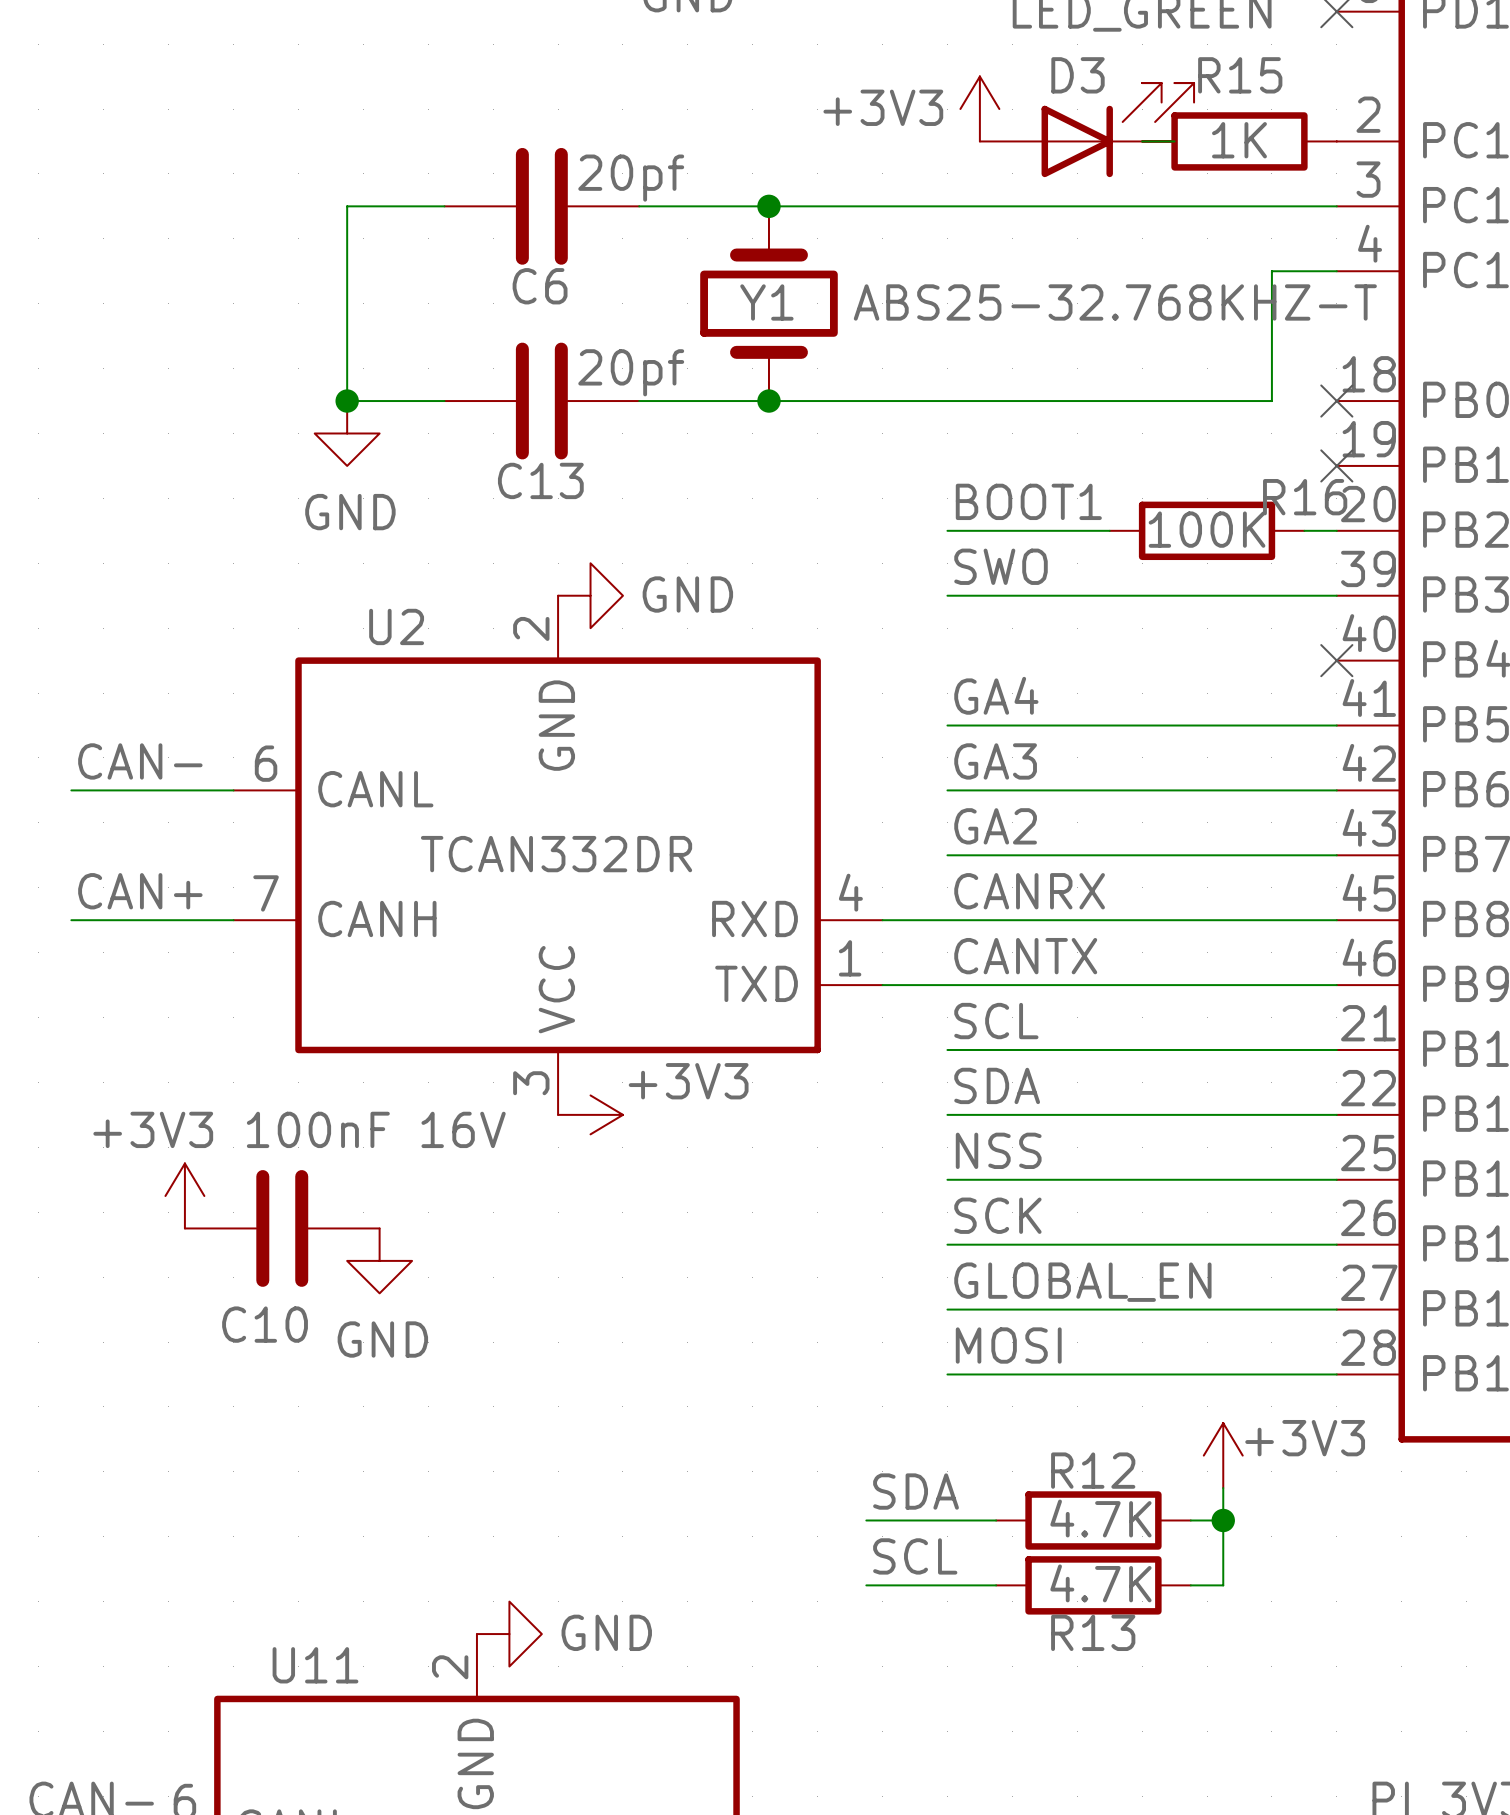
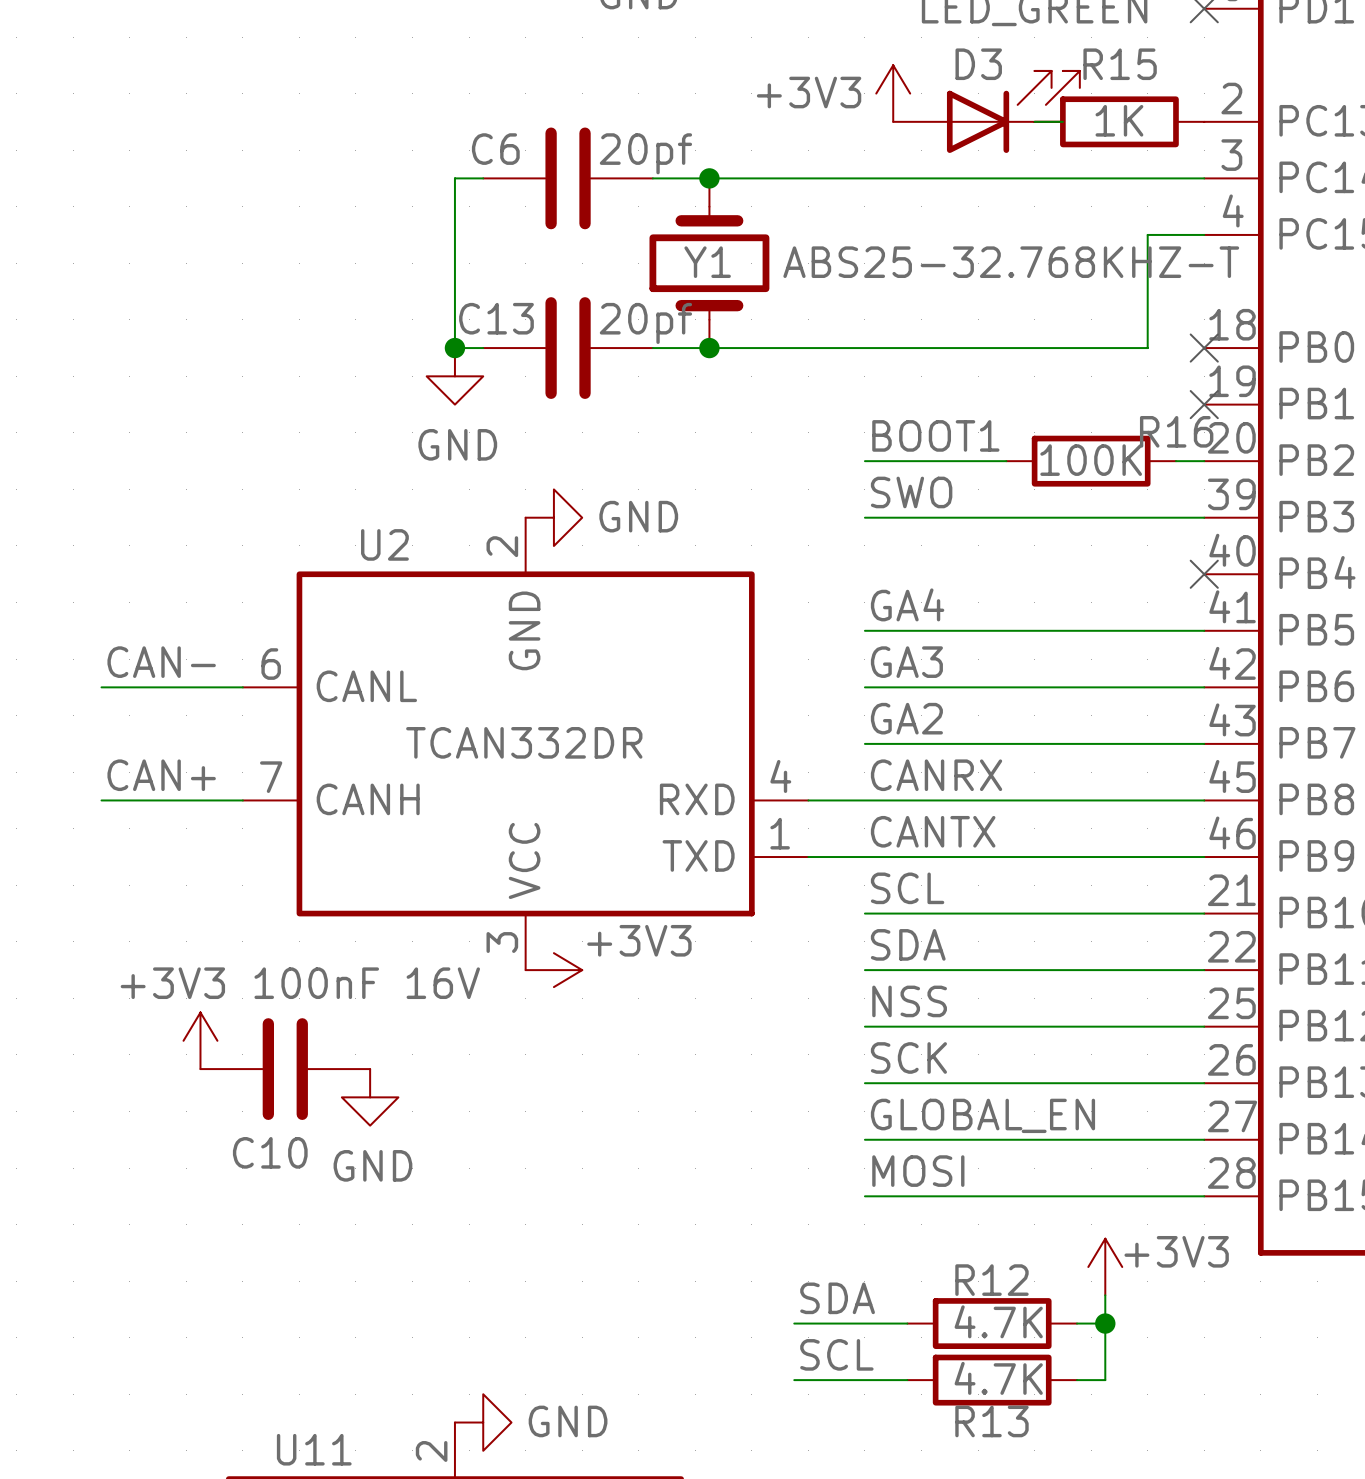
wire: (444, 206) (347, 206) (347, 401) (444, 401) -> none
wire: none -> (483, 178) (454, 178) (454, 348) (483, 348)
C6 position: (541, 206) -> (568, 178)
C6 name position: C6 (540, 286) -> C6 (495, 149)
junction position: (347, 401) -> (454, 348)
C13 position: (541, 401) -> (568, 348)
power symbol position: GND (347, 433) -> GND (454, 376)
C13 name position: C13 (540, 480) -> C13 (496, 318)

